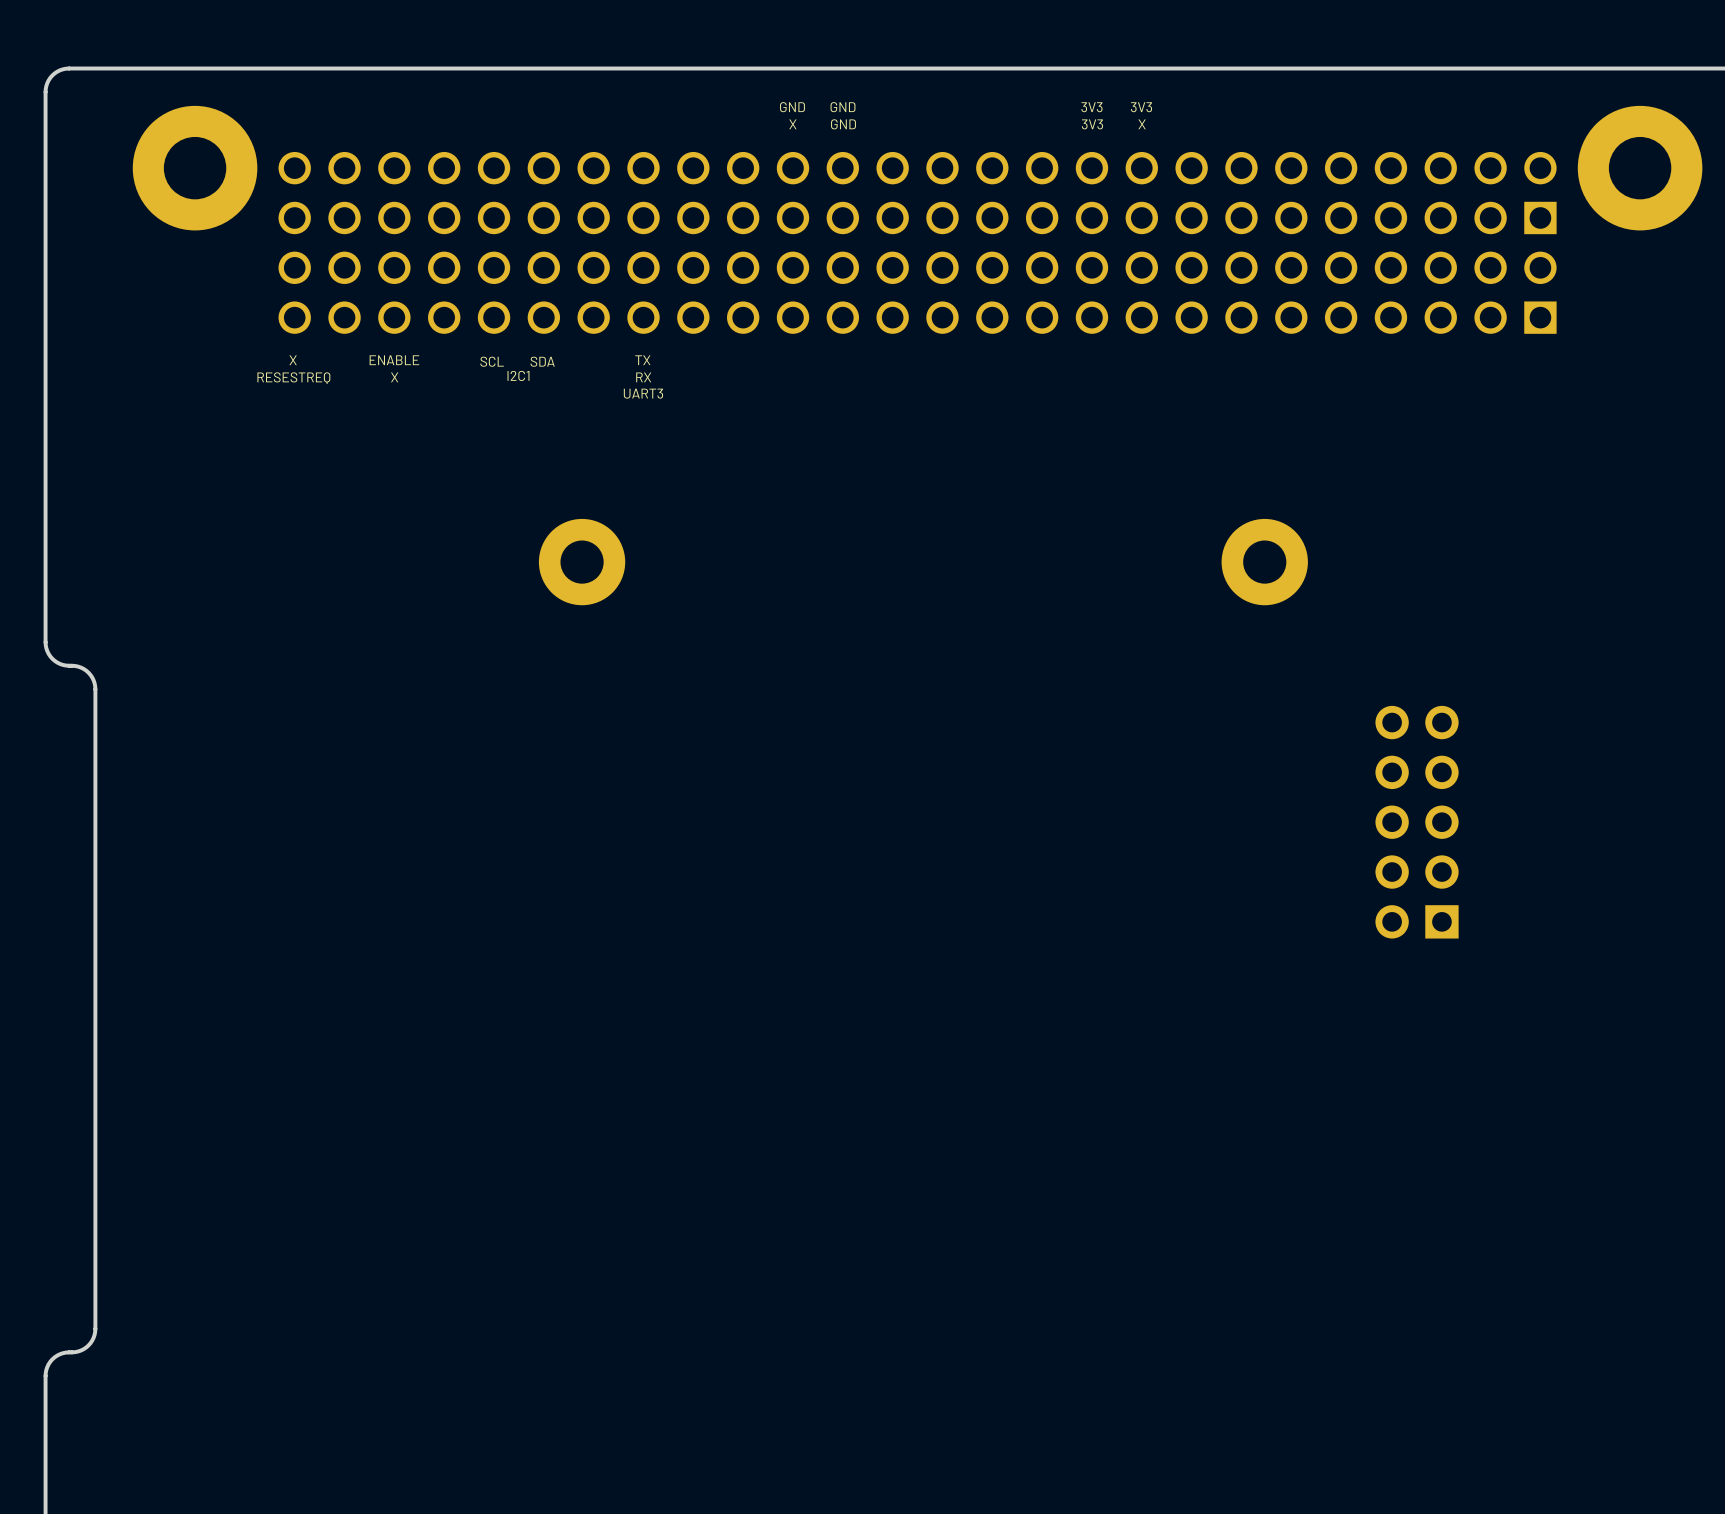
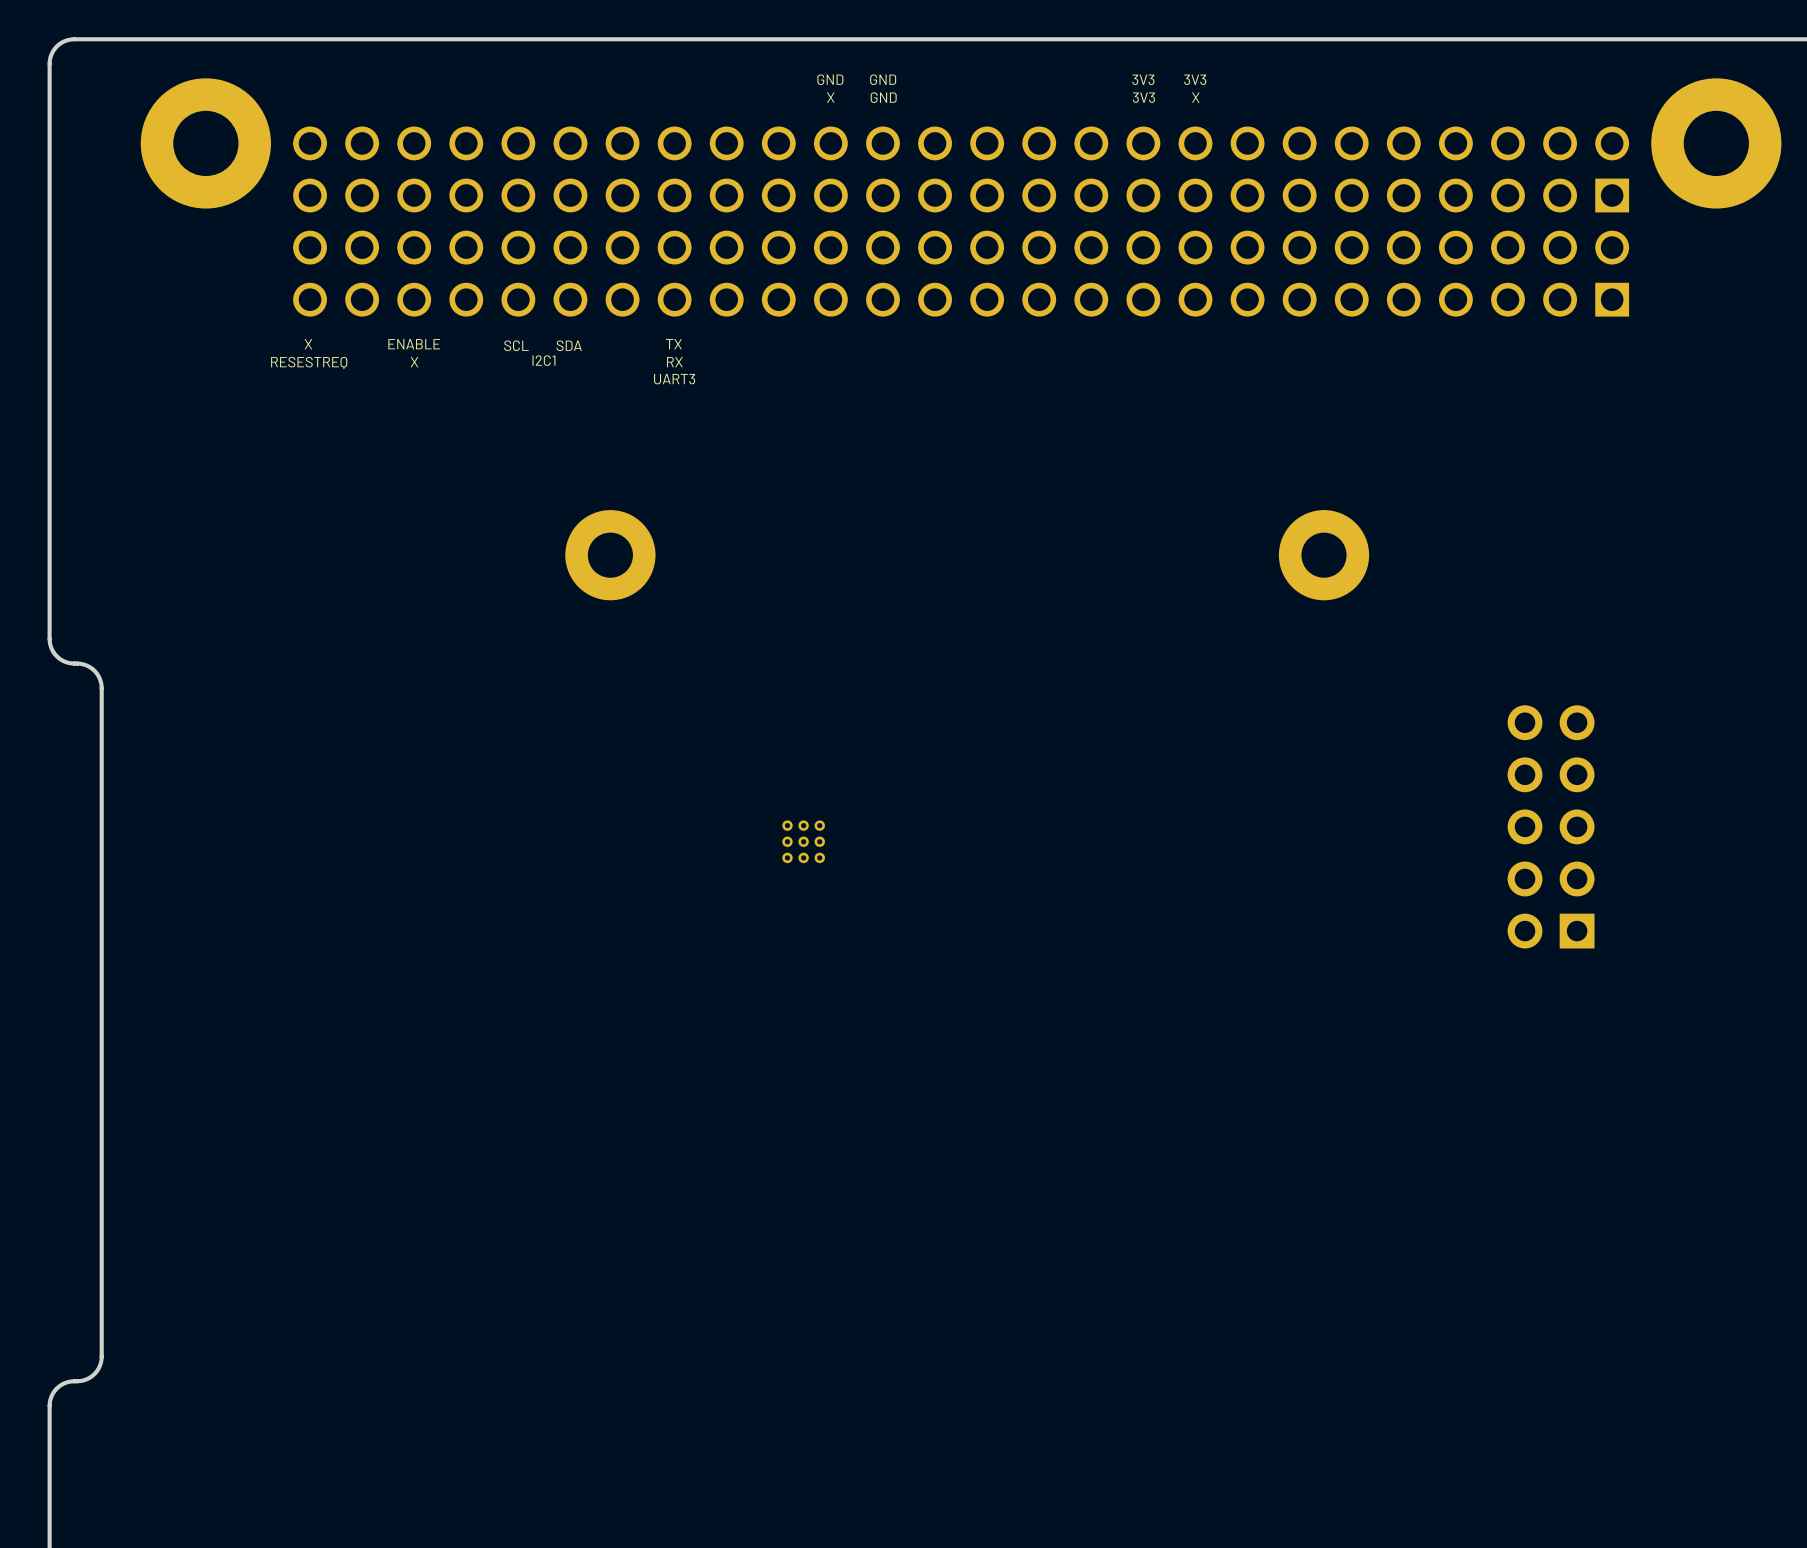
part position: (1417, 822) -> (1551, 826)
part: none -> (803, 841)

